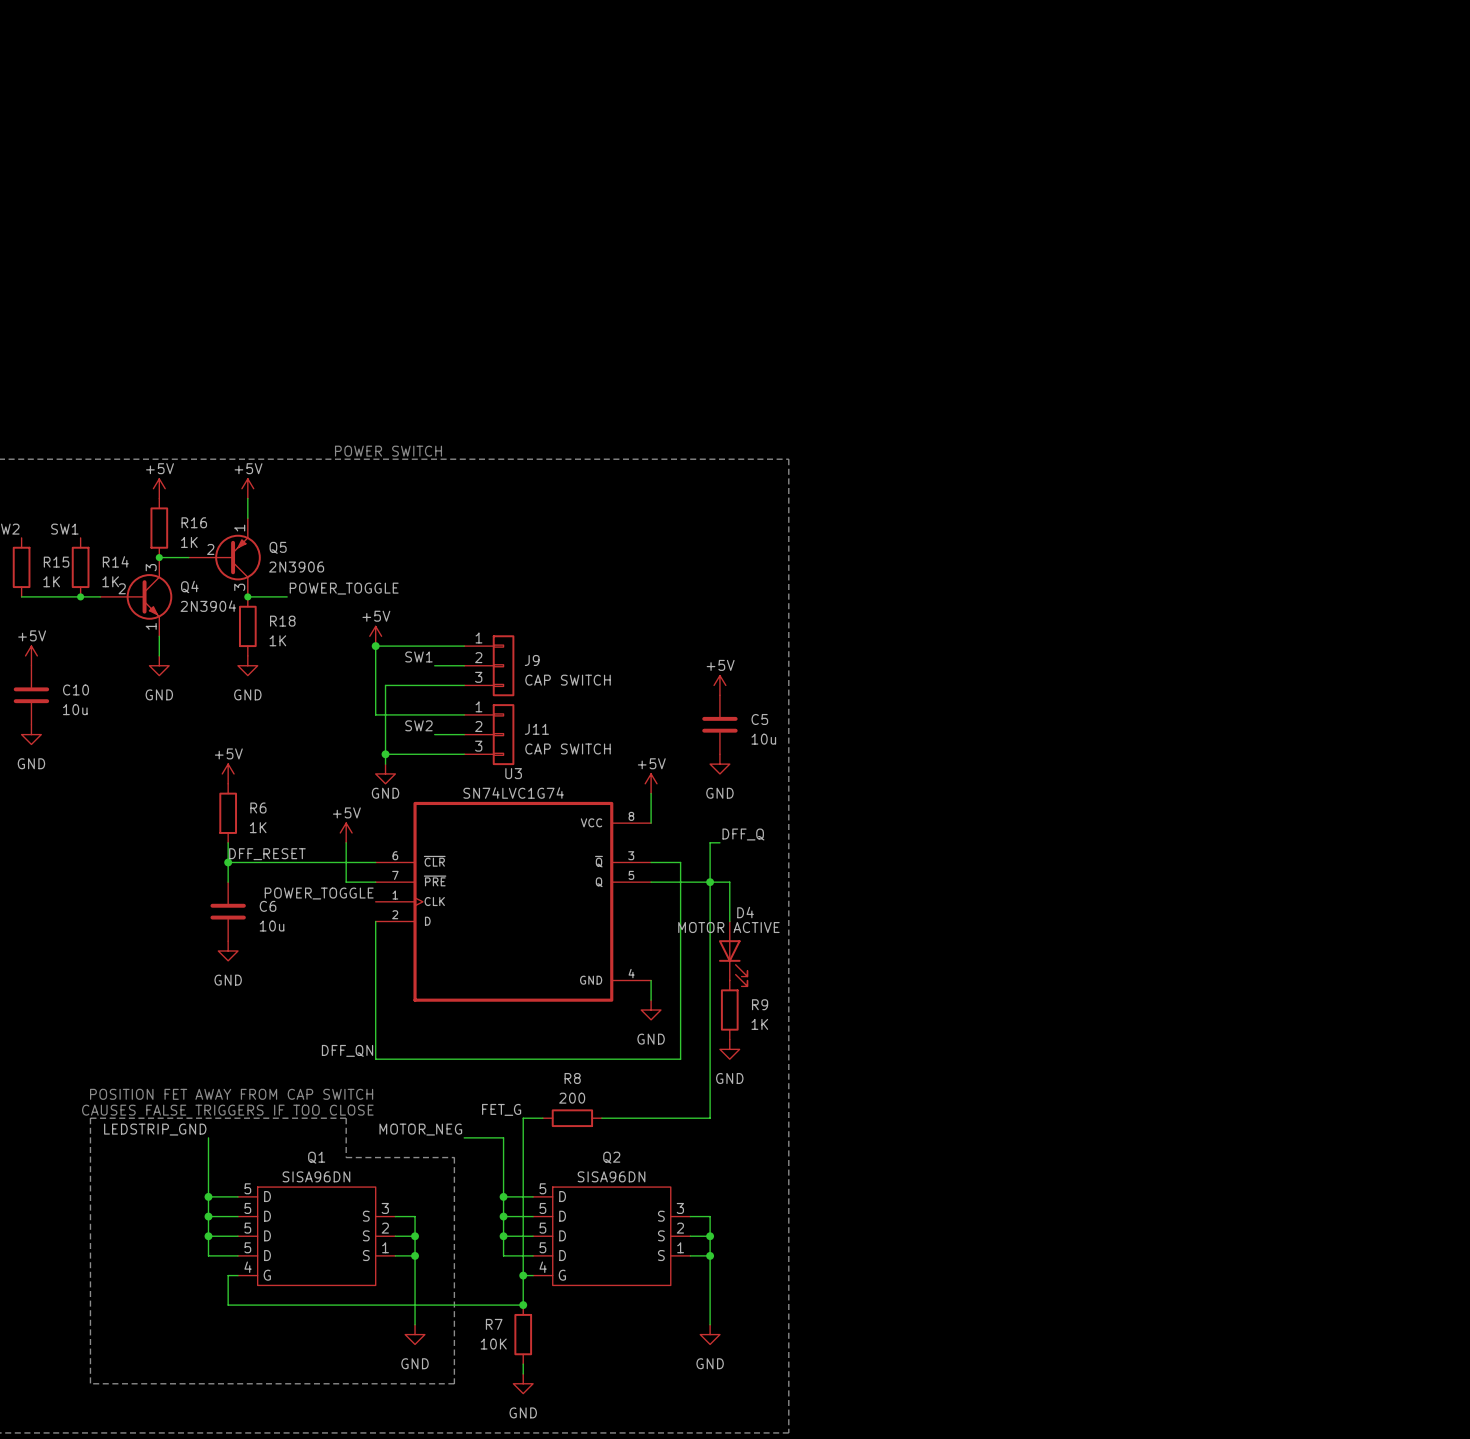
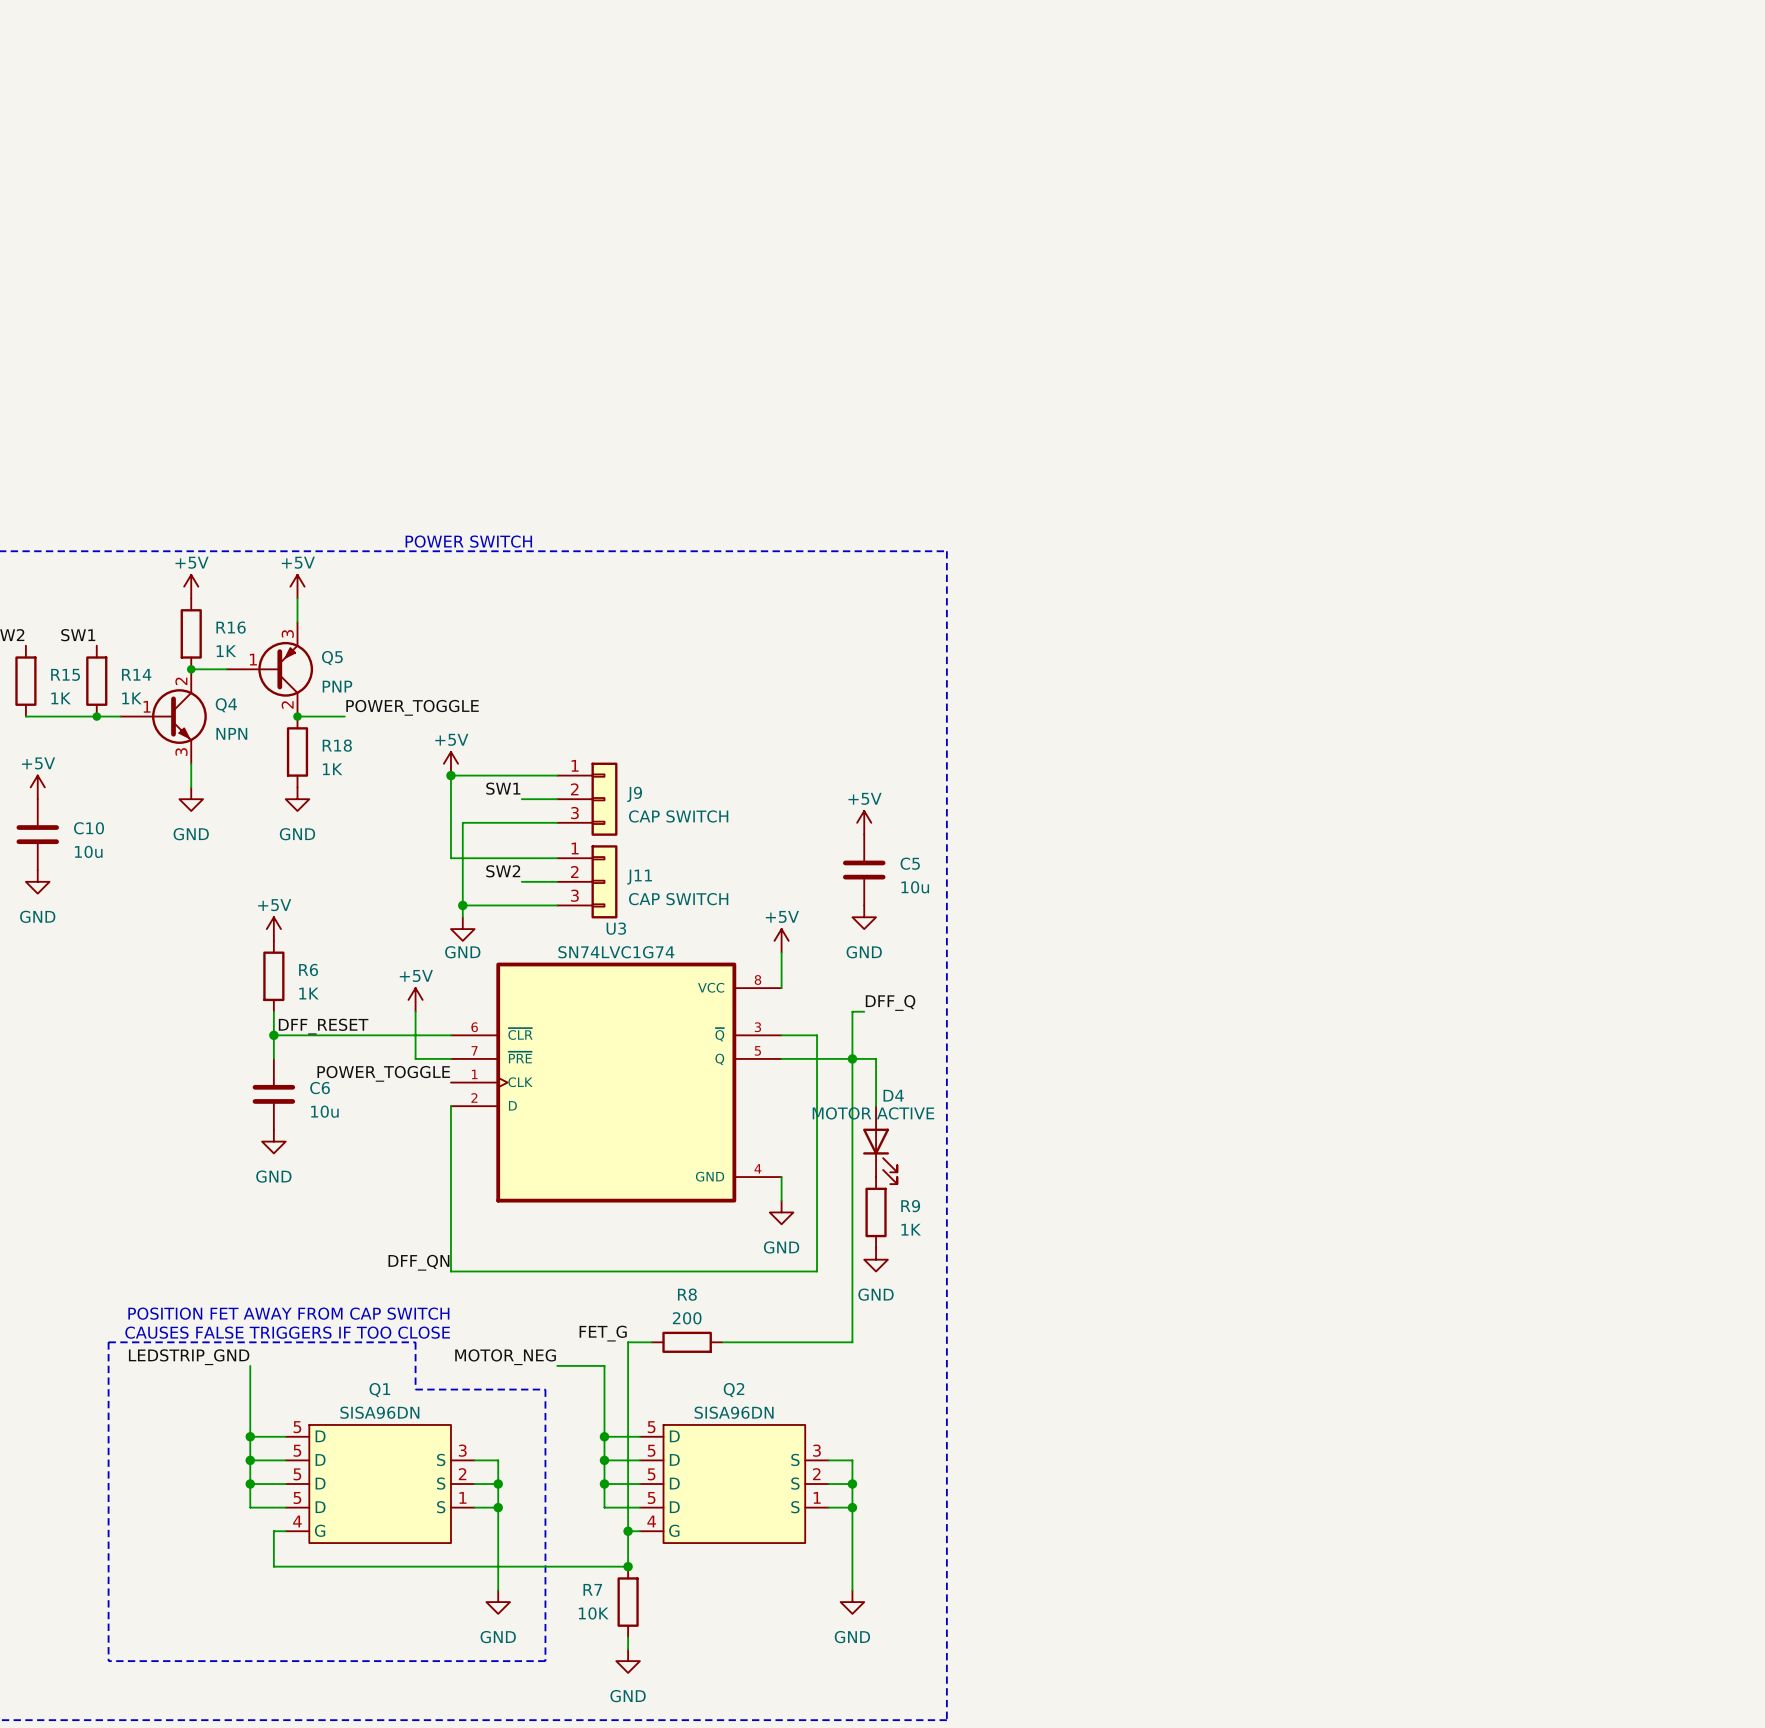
Q5 pin number: 1 (239, 528) -> 3 (287, 633)
Q5 pin number: 2 (210, 549) -> 1 (253, 659)
Q4 pin number: 3 (151, 567) -> 2 (181, 681)
Q5 value: 2N3906 (296, 567) -> PNP (337, 686)
Q5 pin number: 3 (239, 587) -> 2 (287, 704)
Q4 pin number: 2 (122, 588) -> 1 (147, 706)
Q4 value: 2N3904 (208, 606) -> NPN (231, 733)
Q4 pin number: 1 (151, 626) -> 3 (181, 752)

